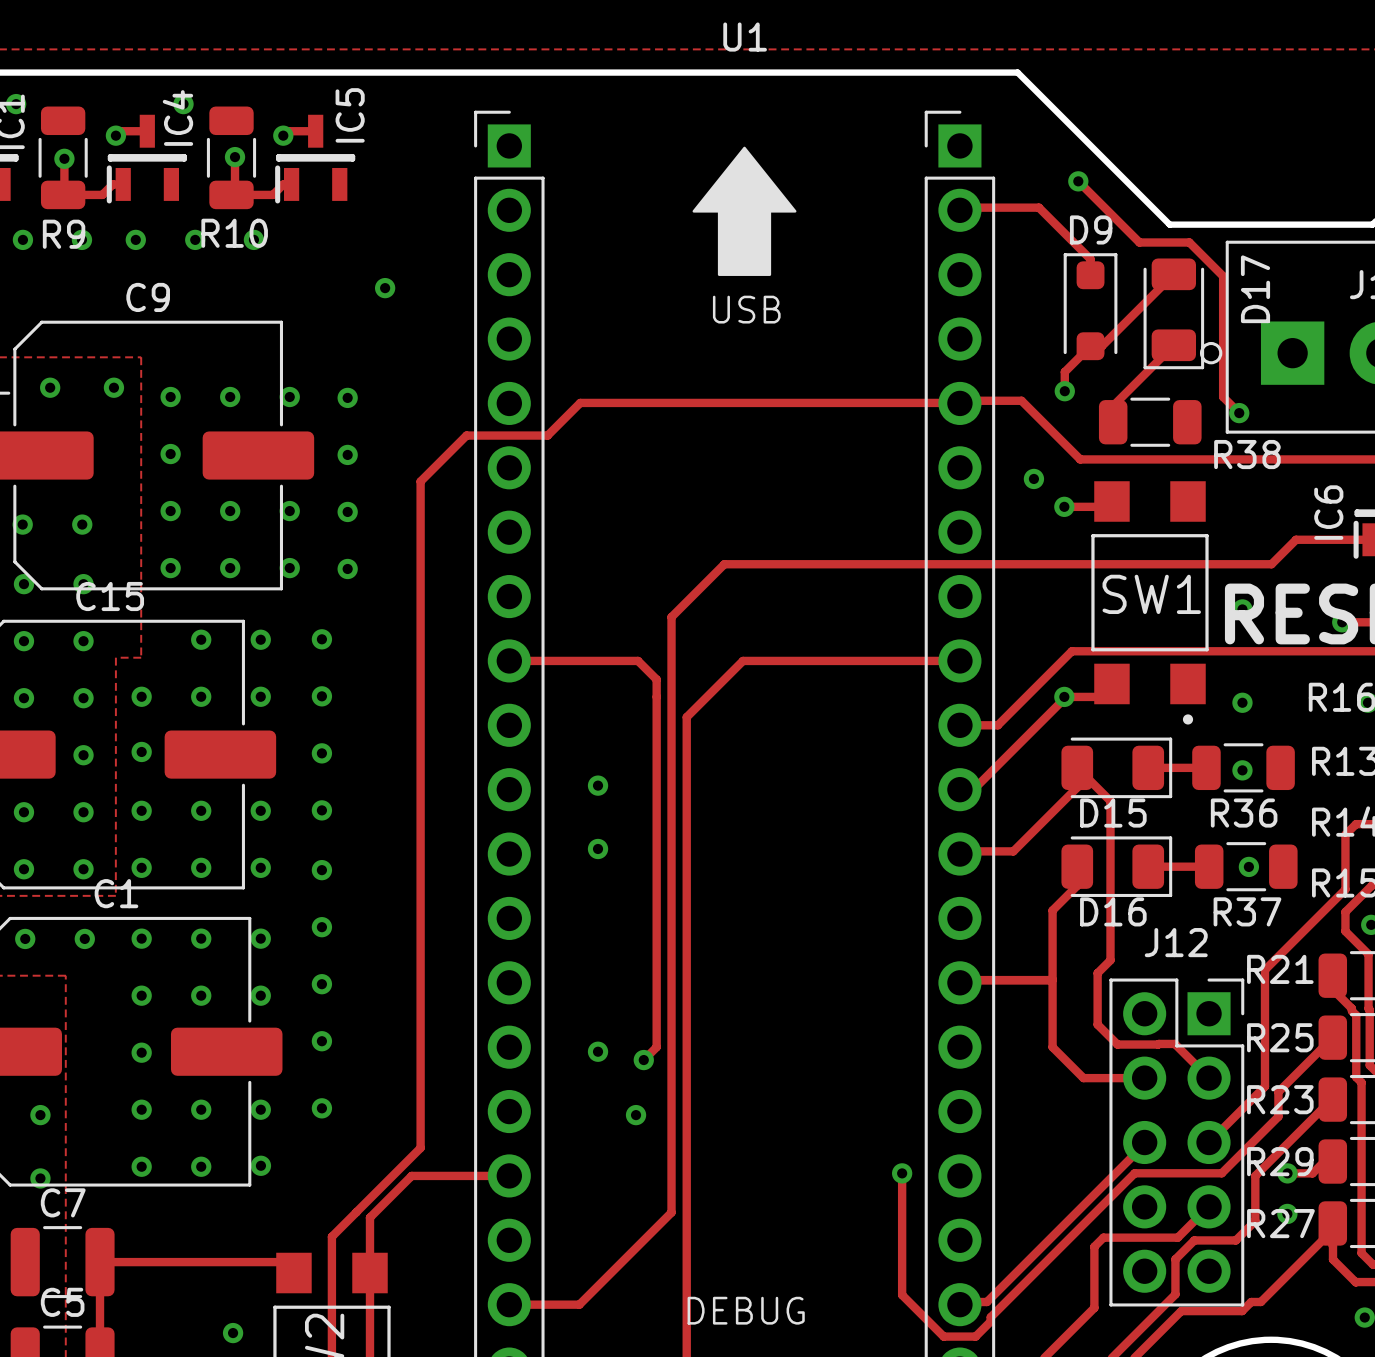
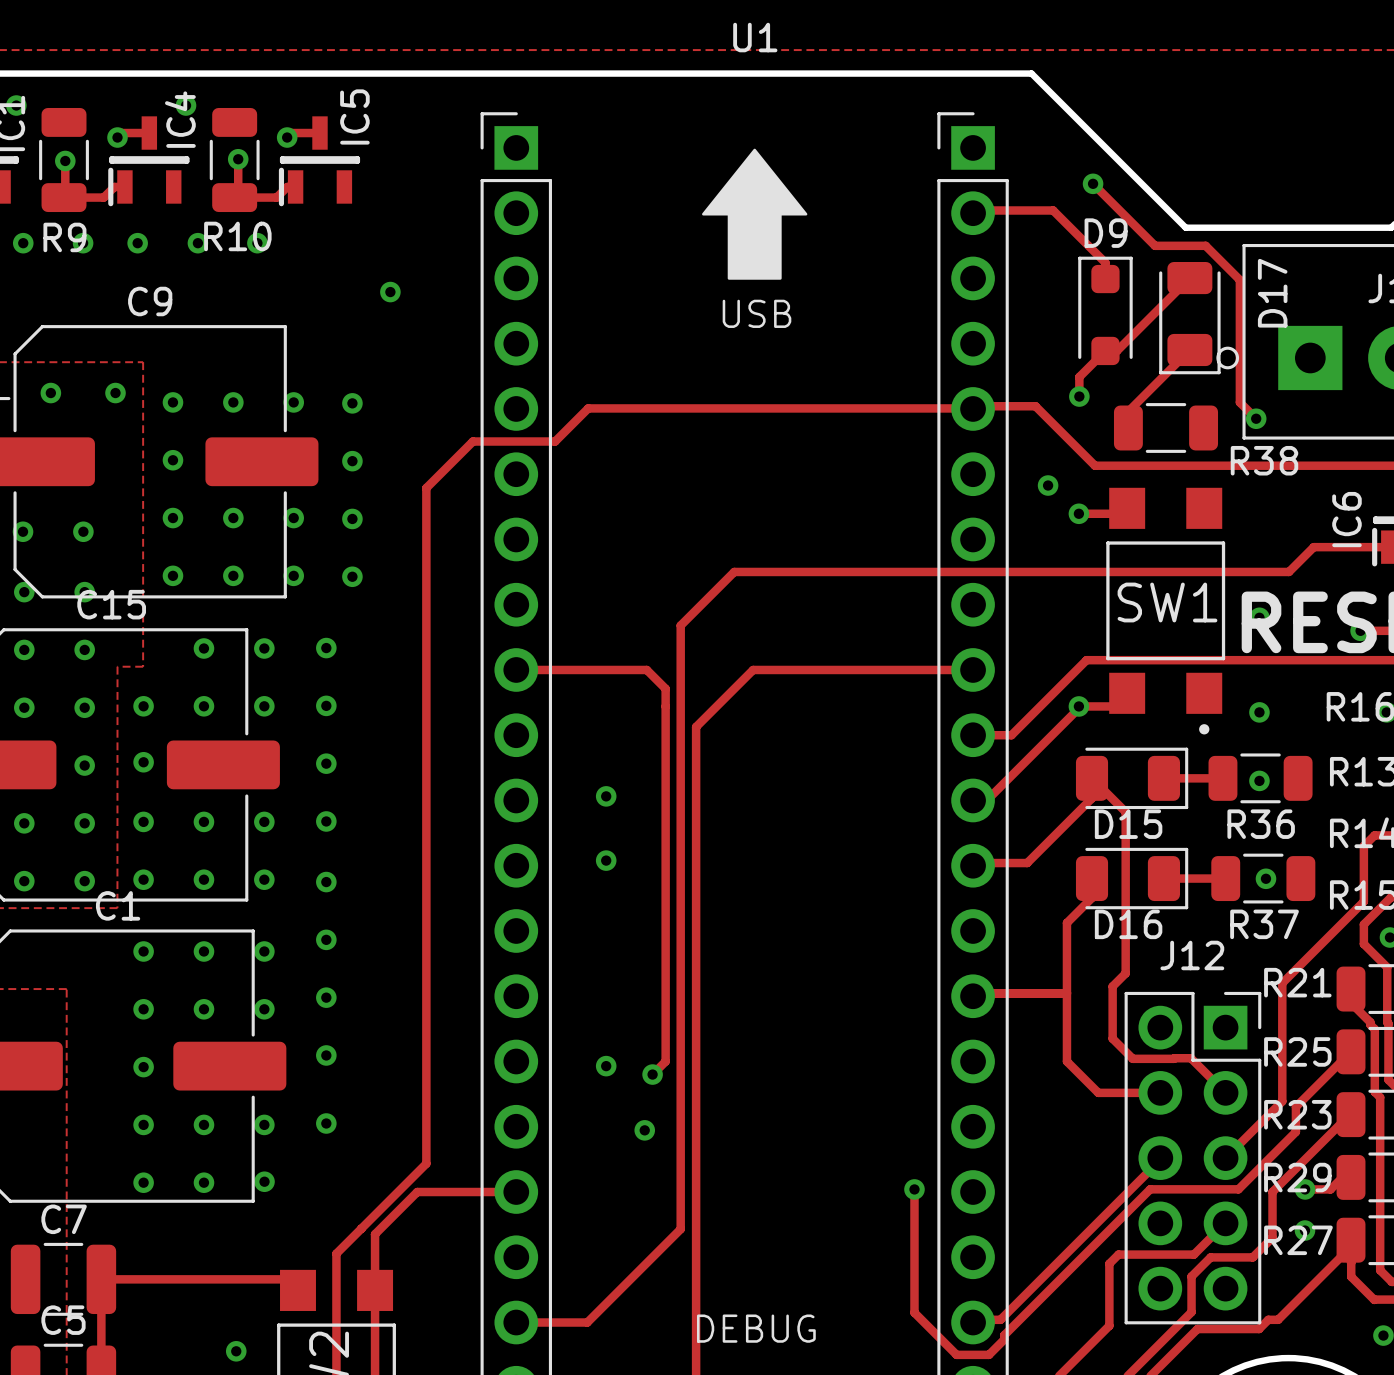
via: (25, 938) -> none
via: (84, 938) -> none
via: (40, 1115) -> none
via: (40, 1178) -> none

